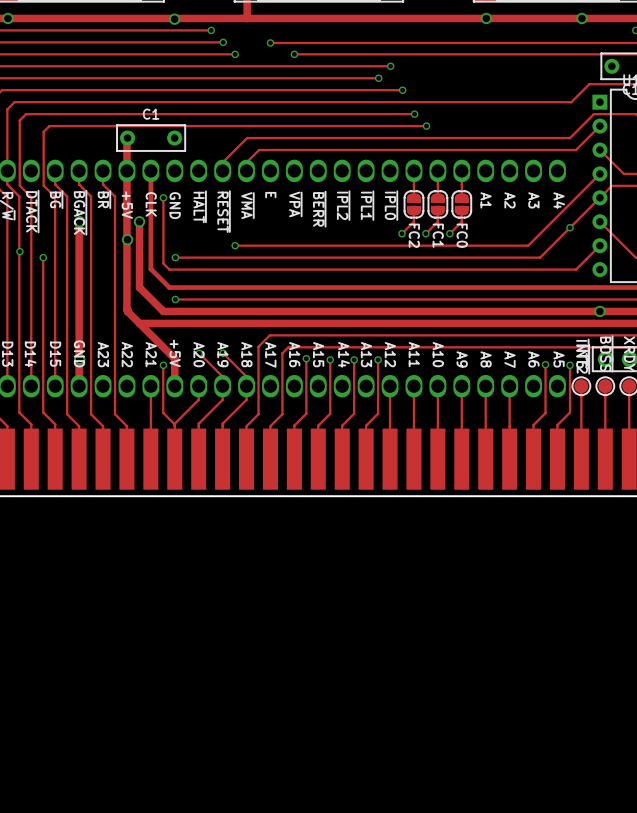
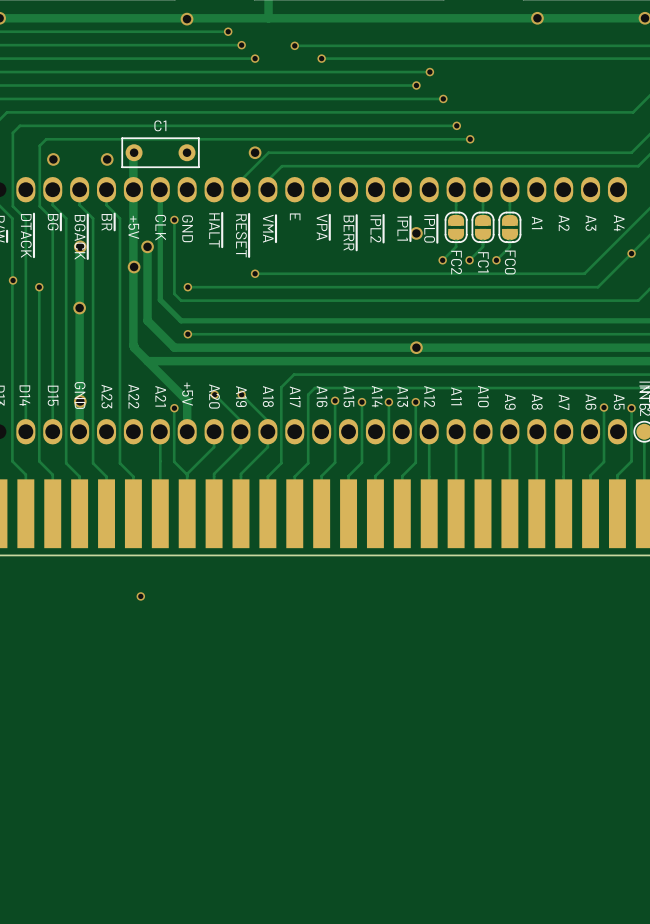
via: none -> (255, 152)
via: none -> (53, 159)
via: none -> (107, 159)
via: none -> (416, 233)
via: none -> (79, 308)
via: none -> (416, 347)
via: none -> (140, 596)

